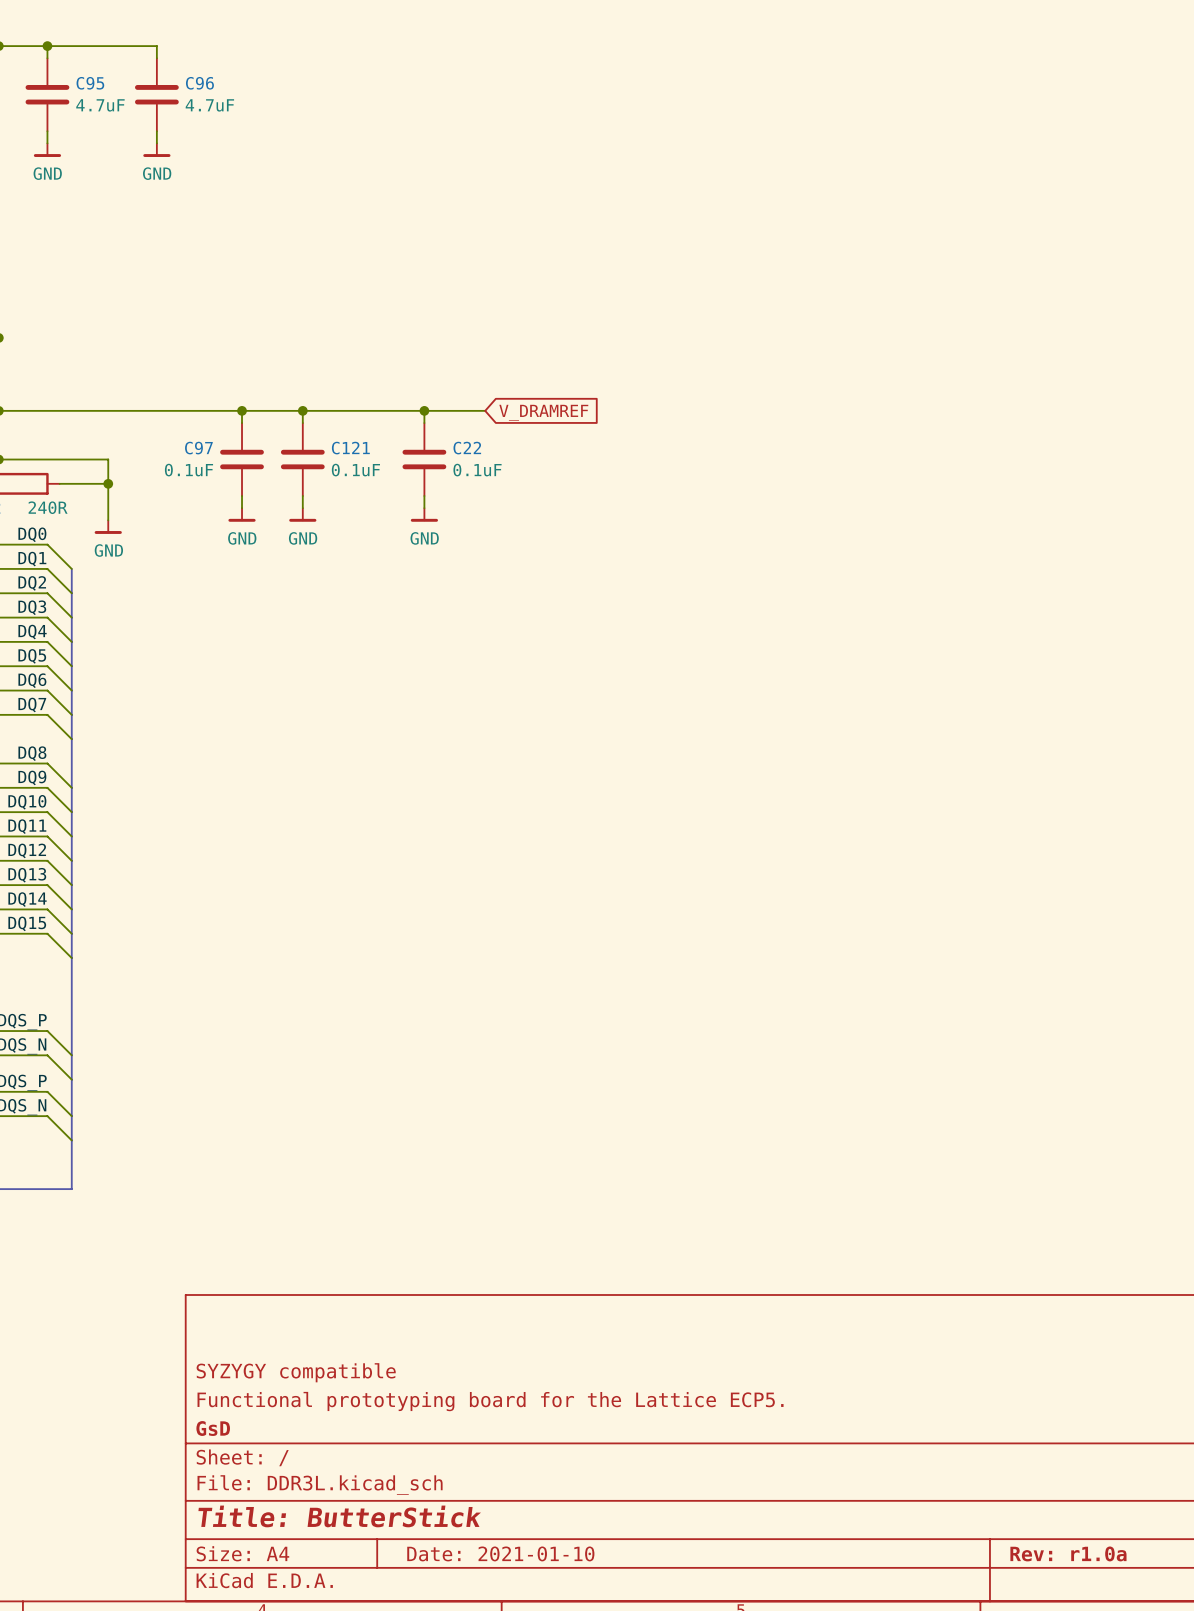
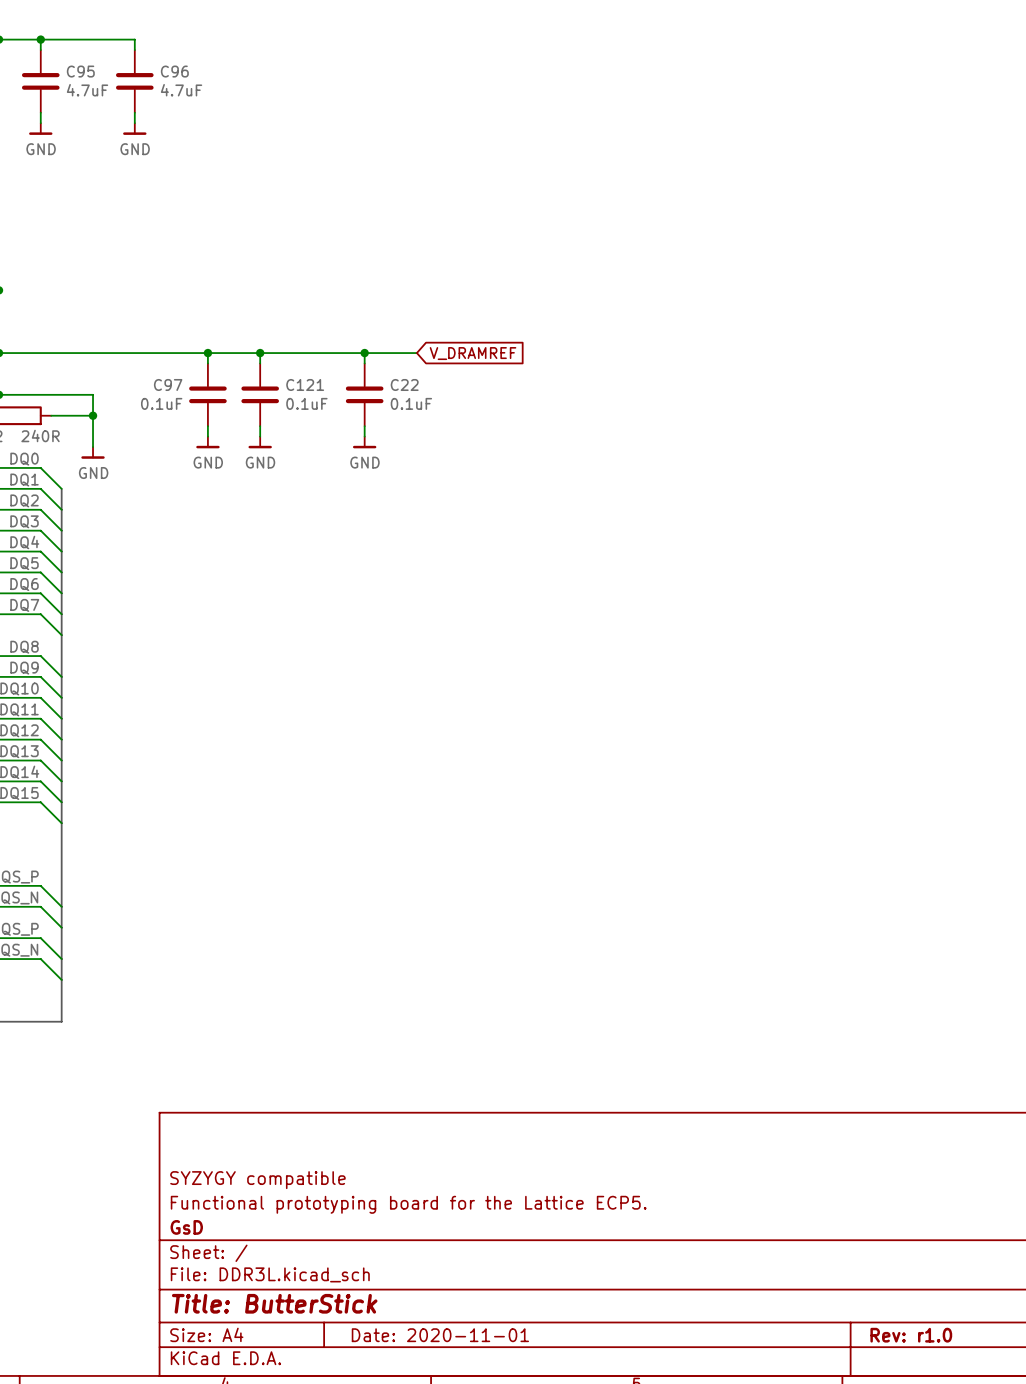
title block: Date: 2021-01-10 (500, 1553) -> Date: 2020-11-01 (440, 1335)
title block: Rev: r1.0a (1068, 1553) -> Rev: r1.0 (911, 1335)

